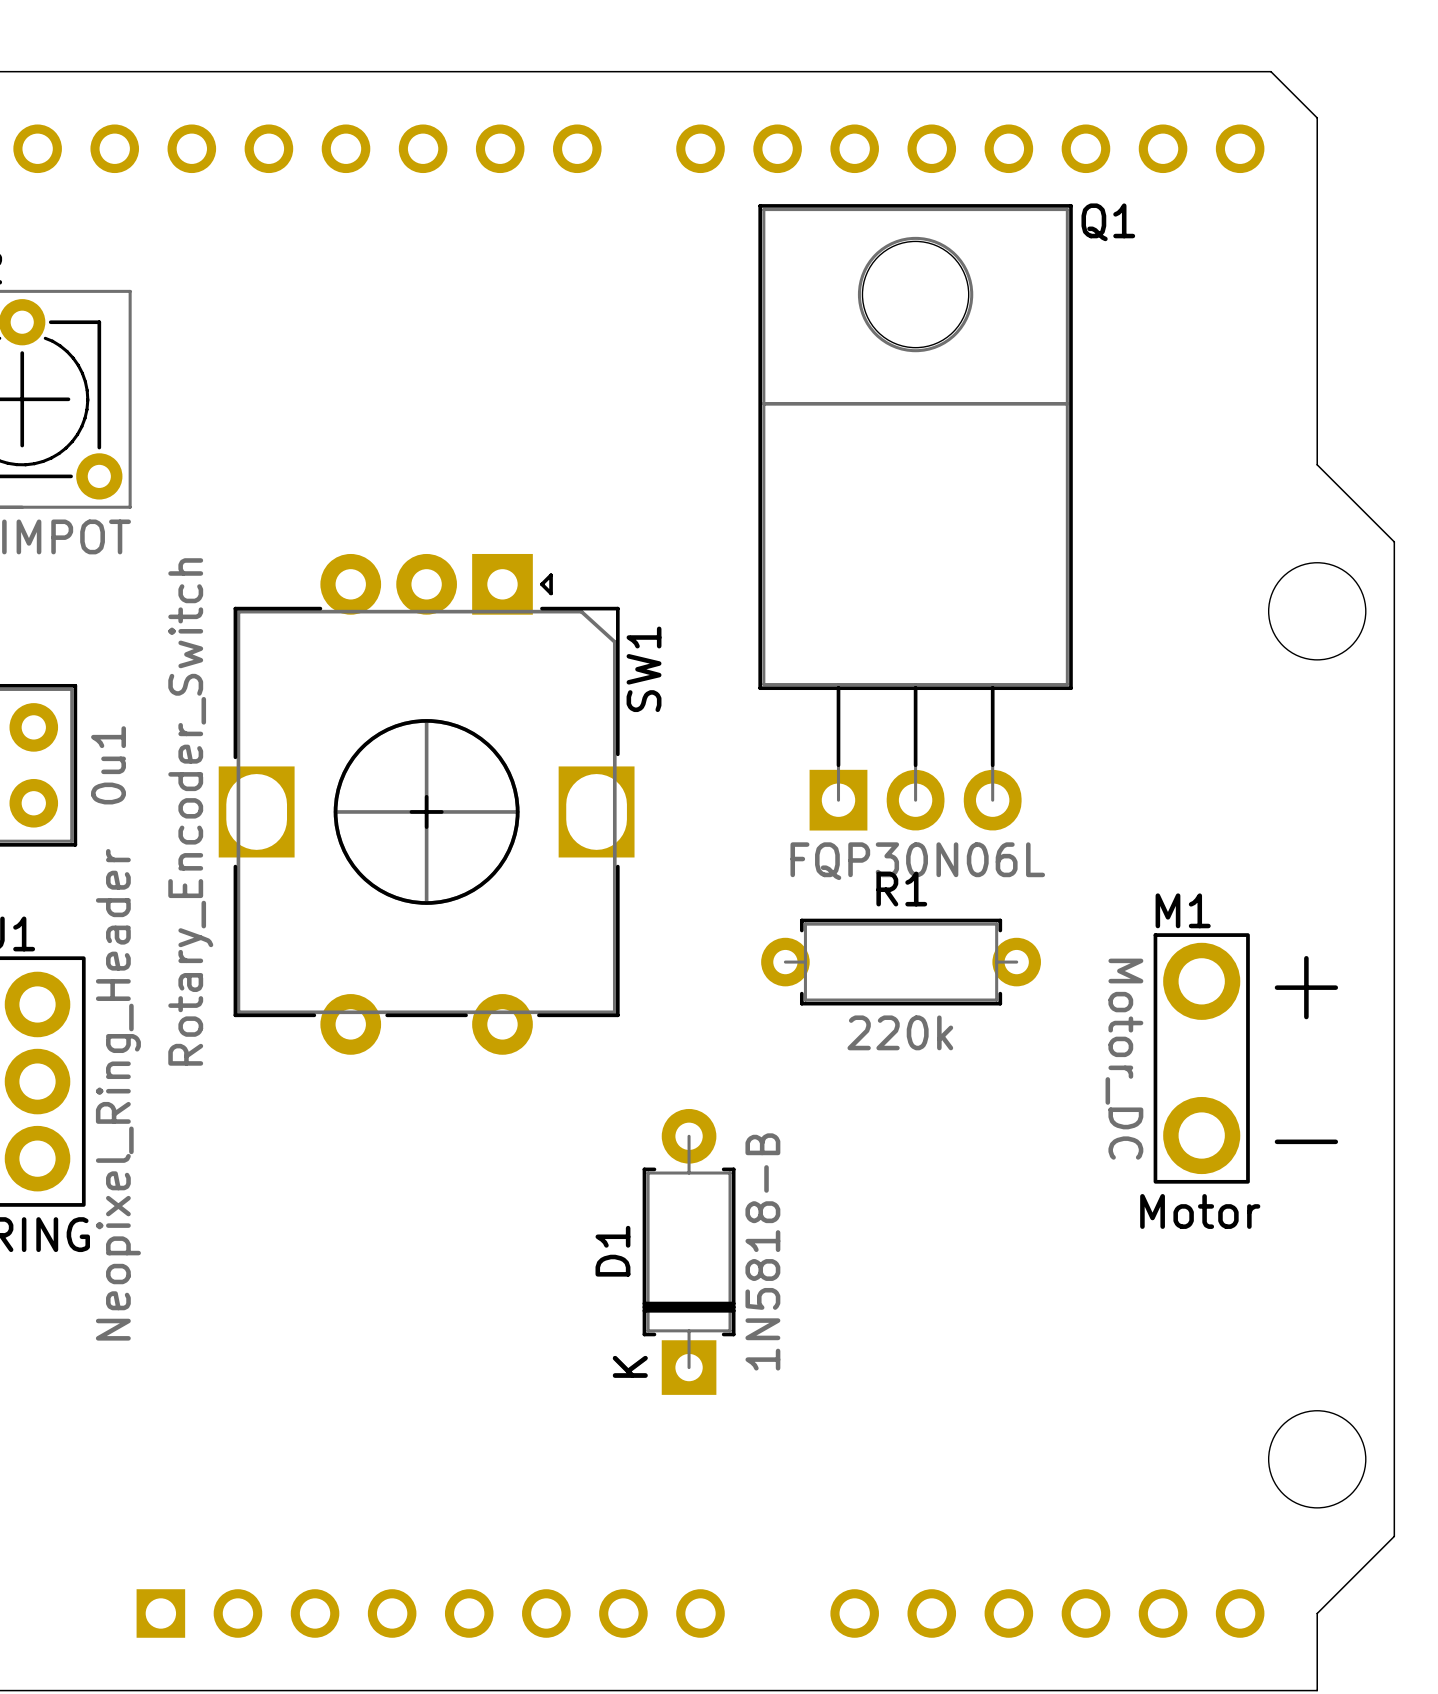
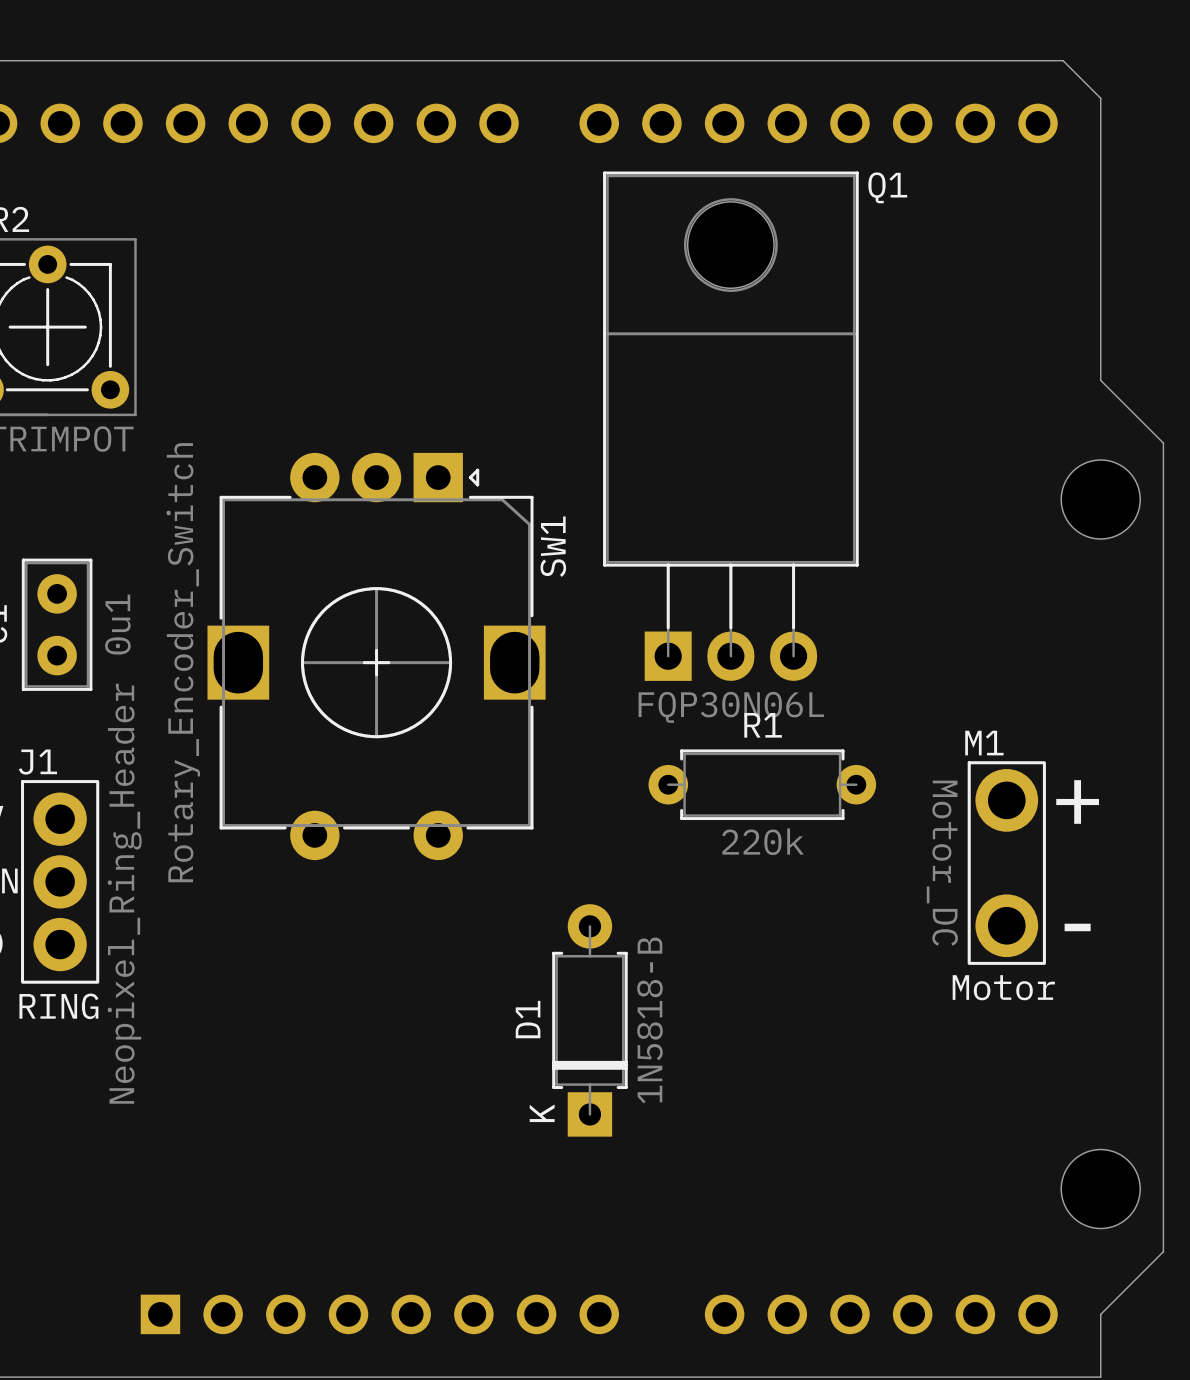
Q1 position: (915, 517) -> (730, 426)

